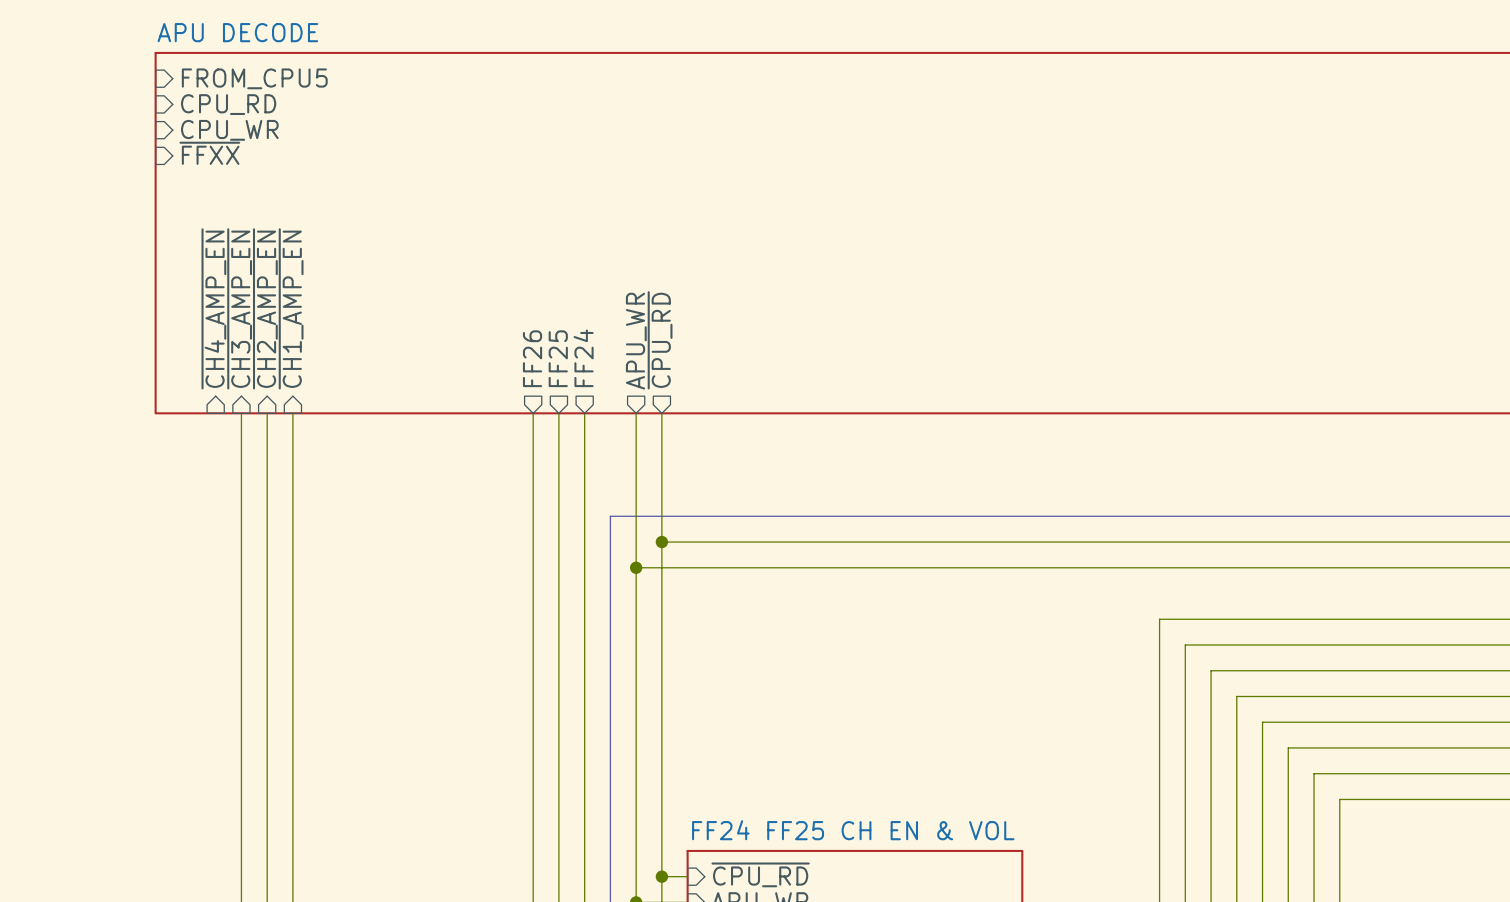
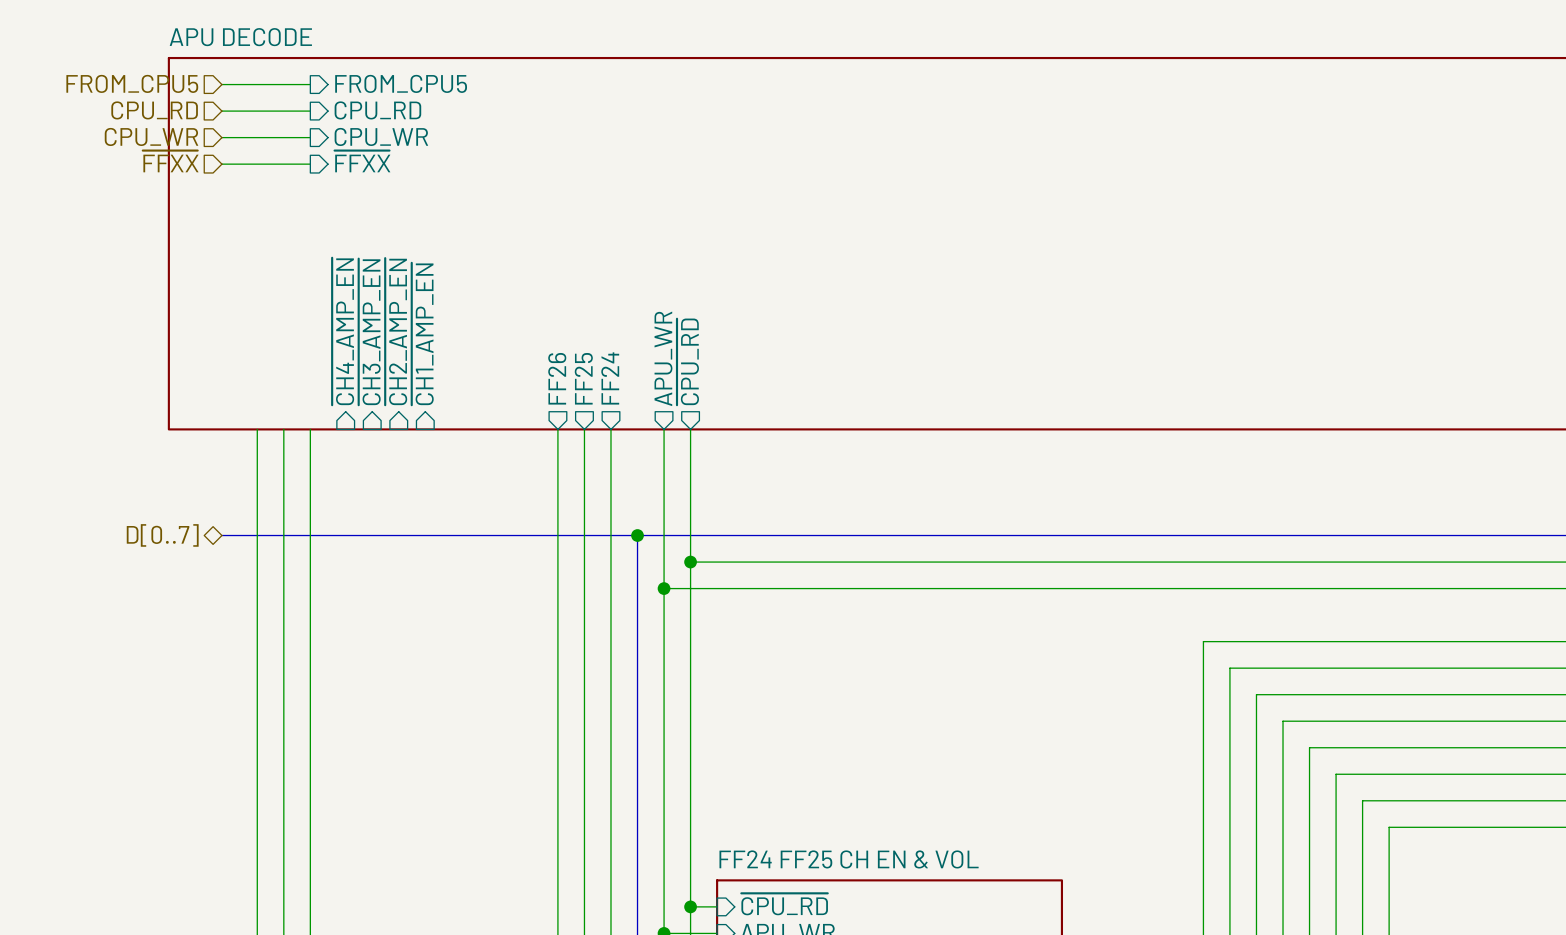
hierarchical label: none -> FROM_CPU5 (132, 83)
wire: none -> (221, 84) (310, 84)
sheet pin position: FROM_CPU5 (254, 78) -> FROM_CPU5 (401, 83)
hierarchical label: none -> CPU_RD (154, 110)
wire: none -> (221, 111) (310, 111)
sheet pin position: CPU_RD (228, 104) -> CPU_RD (377, 110)
hierarchical label: none -> CPU_WR (151, 136)
wire: none -> (221, 137) (310, 137)
sheet pin position: CPU_WR (229, 130) -> CPU_WR (381, 136)
hierarchical label: none -> ~{FFXX} (170, 161)
sheet pin position: ~{FFXX} (209, 153) -> ~{FFXX} (362, 161)
wire: none -> (221, 164) (310, 164)
sheet pin position: ~{CH4_AMP_EN} (213, 308) -> ~{CH4_AMP_EN} (343, 331)
sheet pin position: ~{CH3_AMP_EN} (239, 308) -> ~{CH3_AMP_EN} (369, 331)
sheet pin position: ~{CH2_AMP_EN} (265, 308) -> ~{CH2_AMP_EN} (396, 331)
sheet pin position: ~{CH1_AMP_EN} (291, 308) -> ~{CH1_AMP_EN} (422, 334)
bus: none -> (221, 535) (637, 535)
junction: none -> (637, 535)
hierarchical label: none -> D[0..7] (162, 535)

